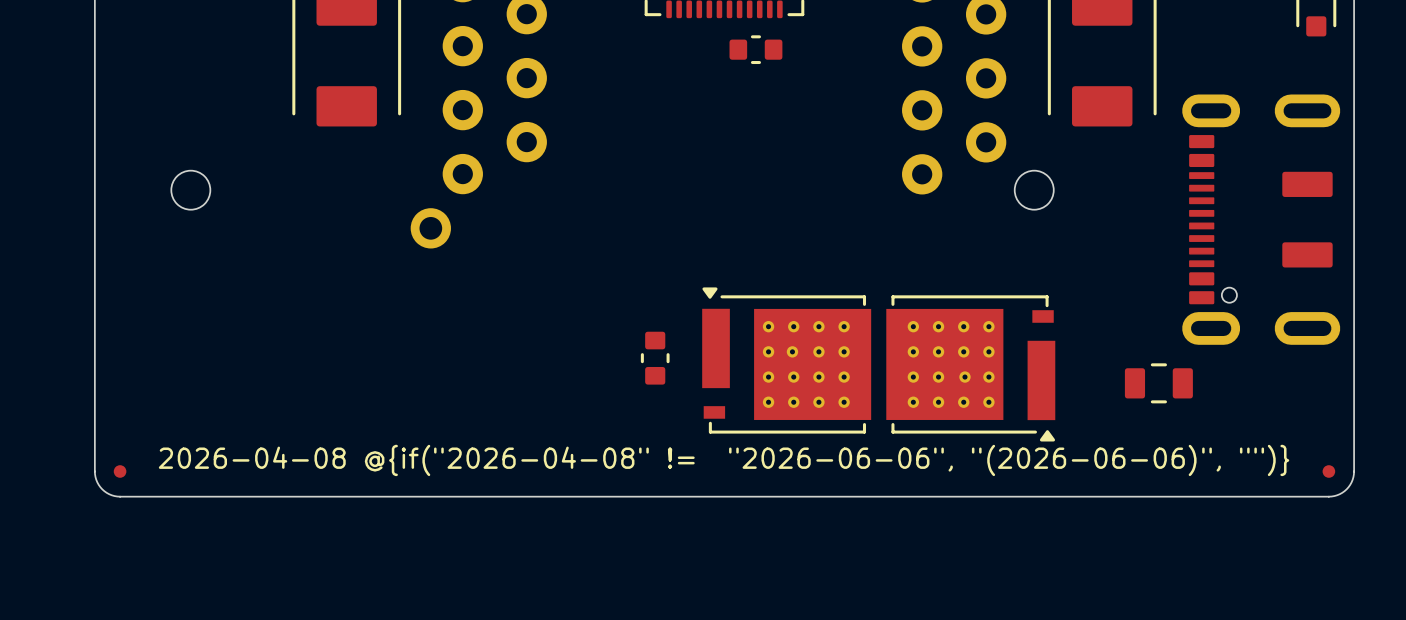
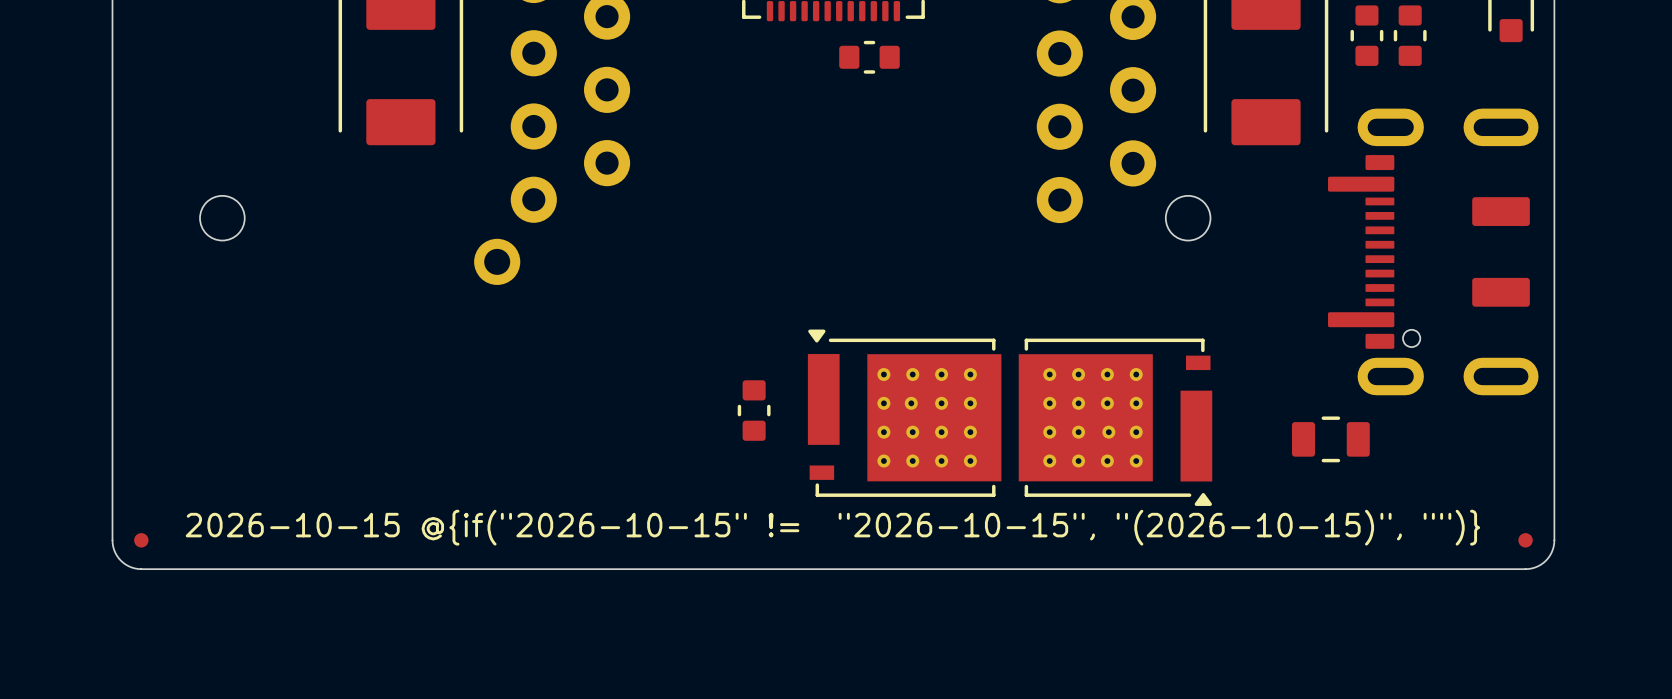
part: none -> (1366, 35)
part: none -> (1410, 35)
part footprint: [1182, 94, 1341, 345] -> [1328, 108, 1539, 396]
drawing shape: [158, 444, 1290, 477] -> [185, 509, 1481, 546]

